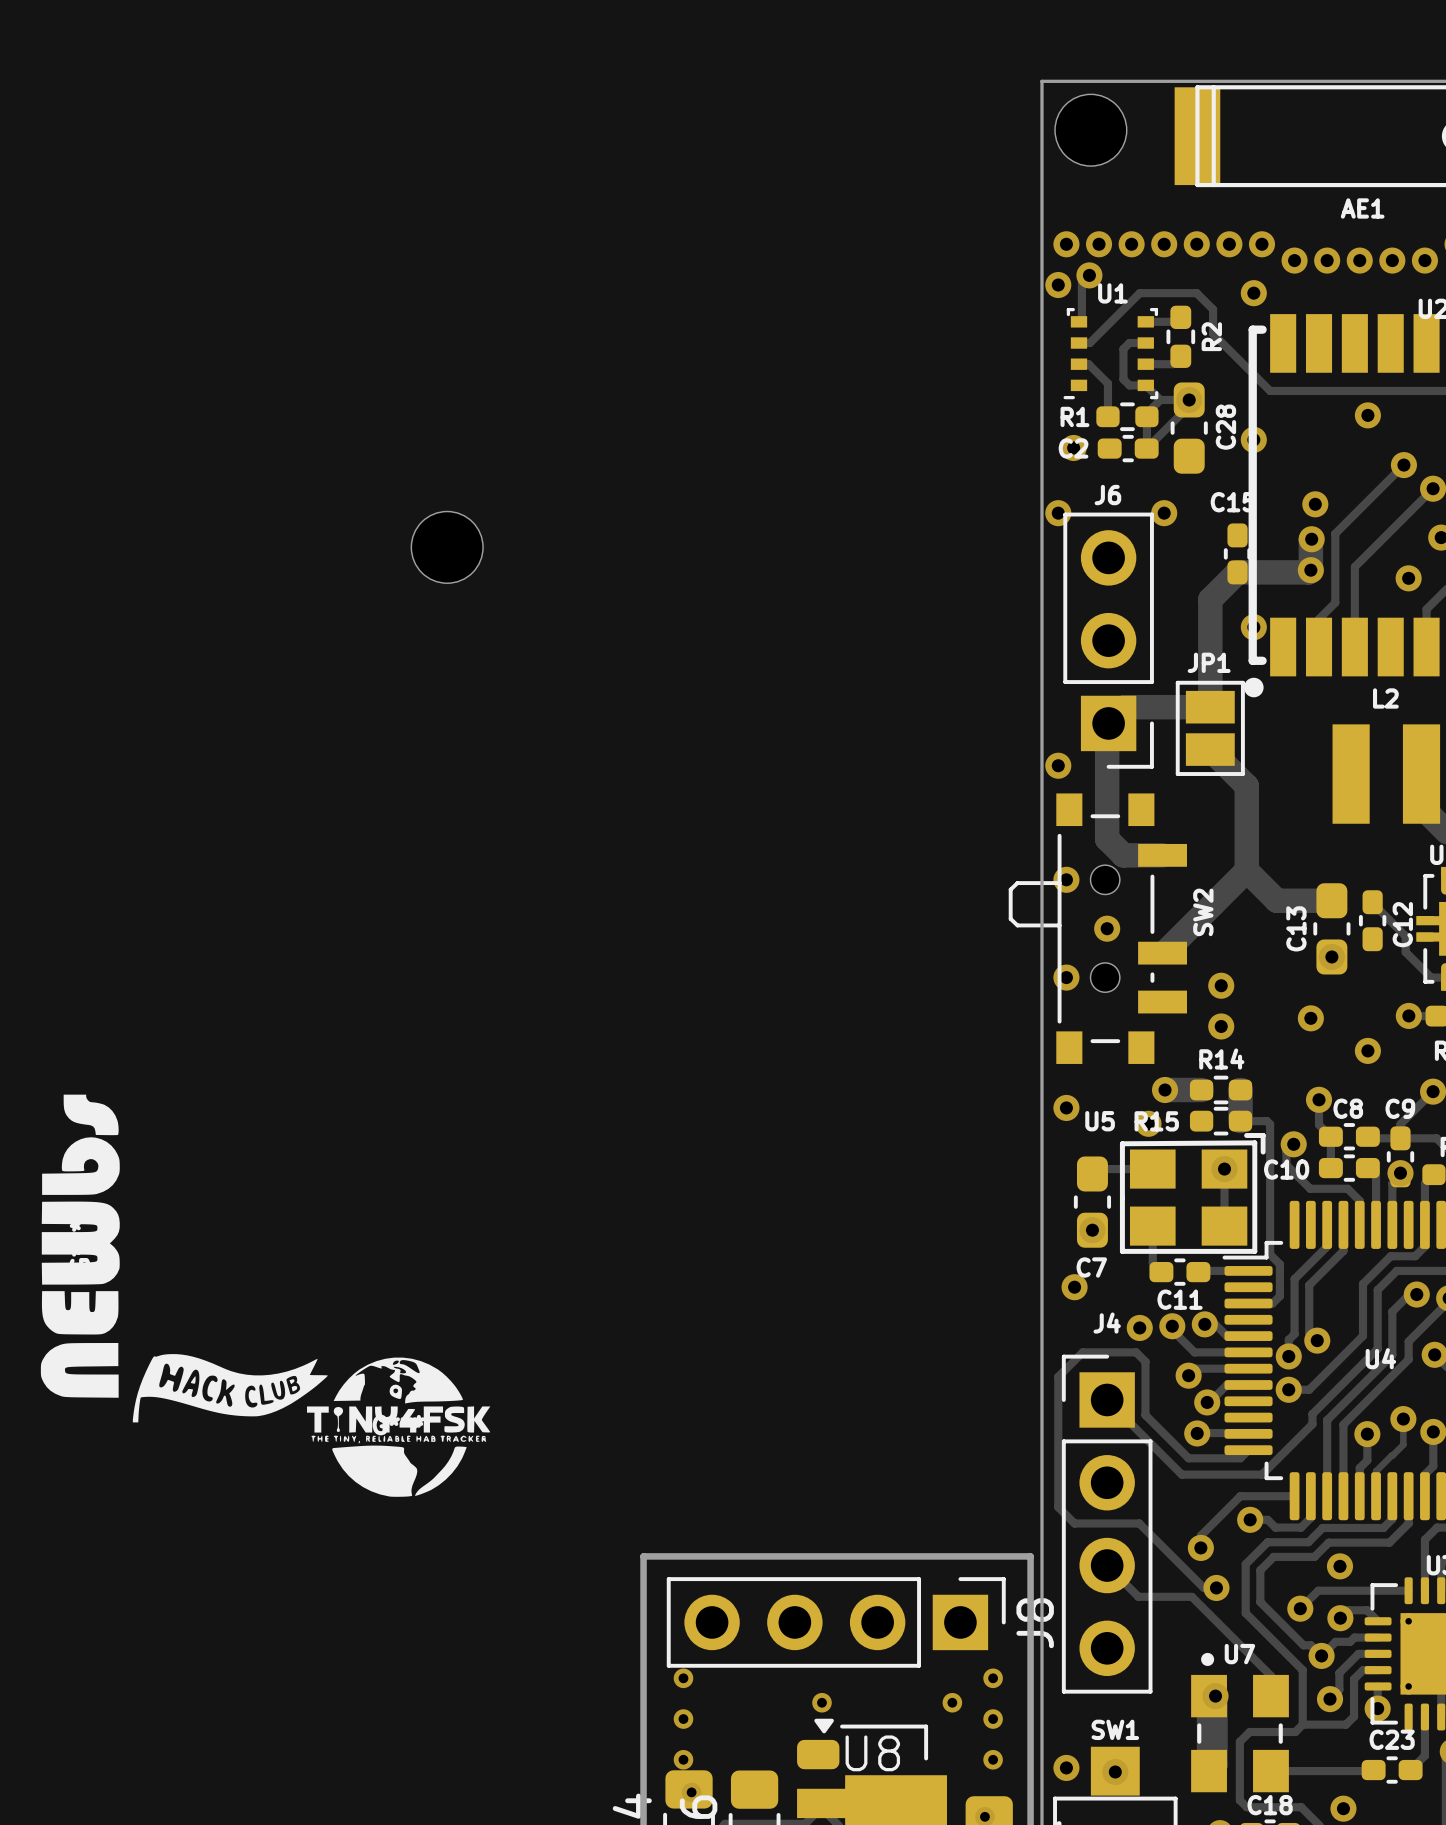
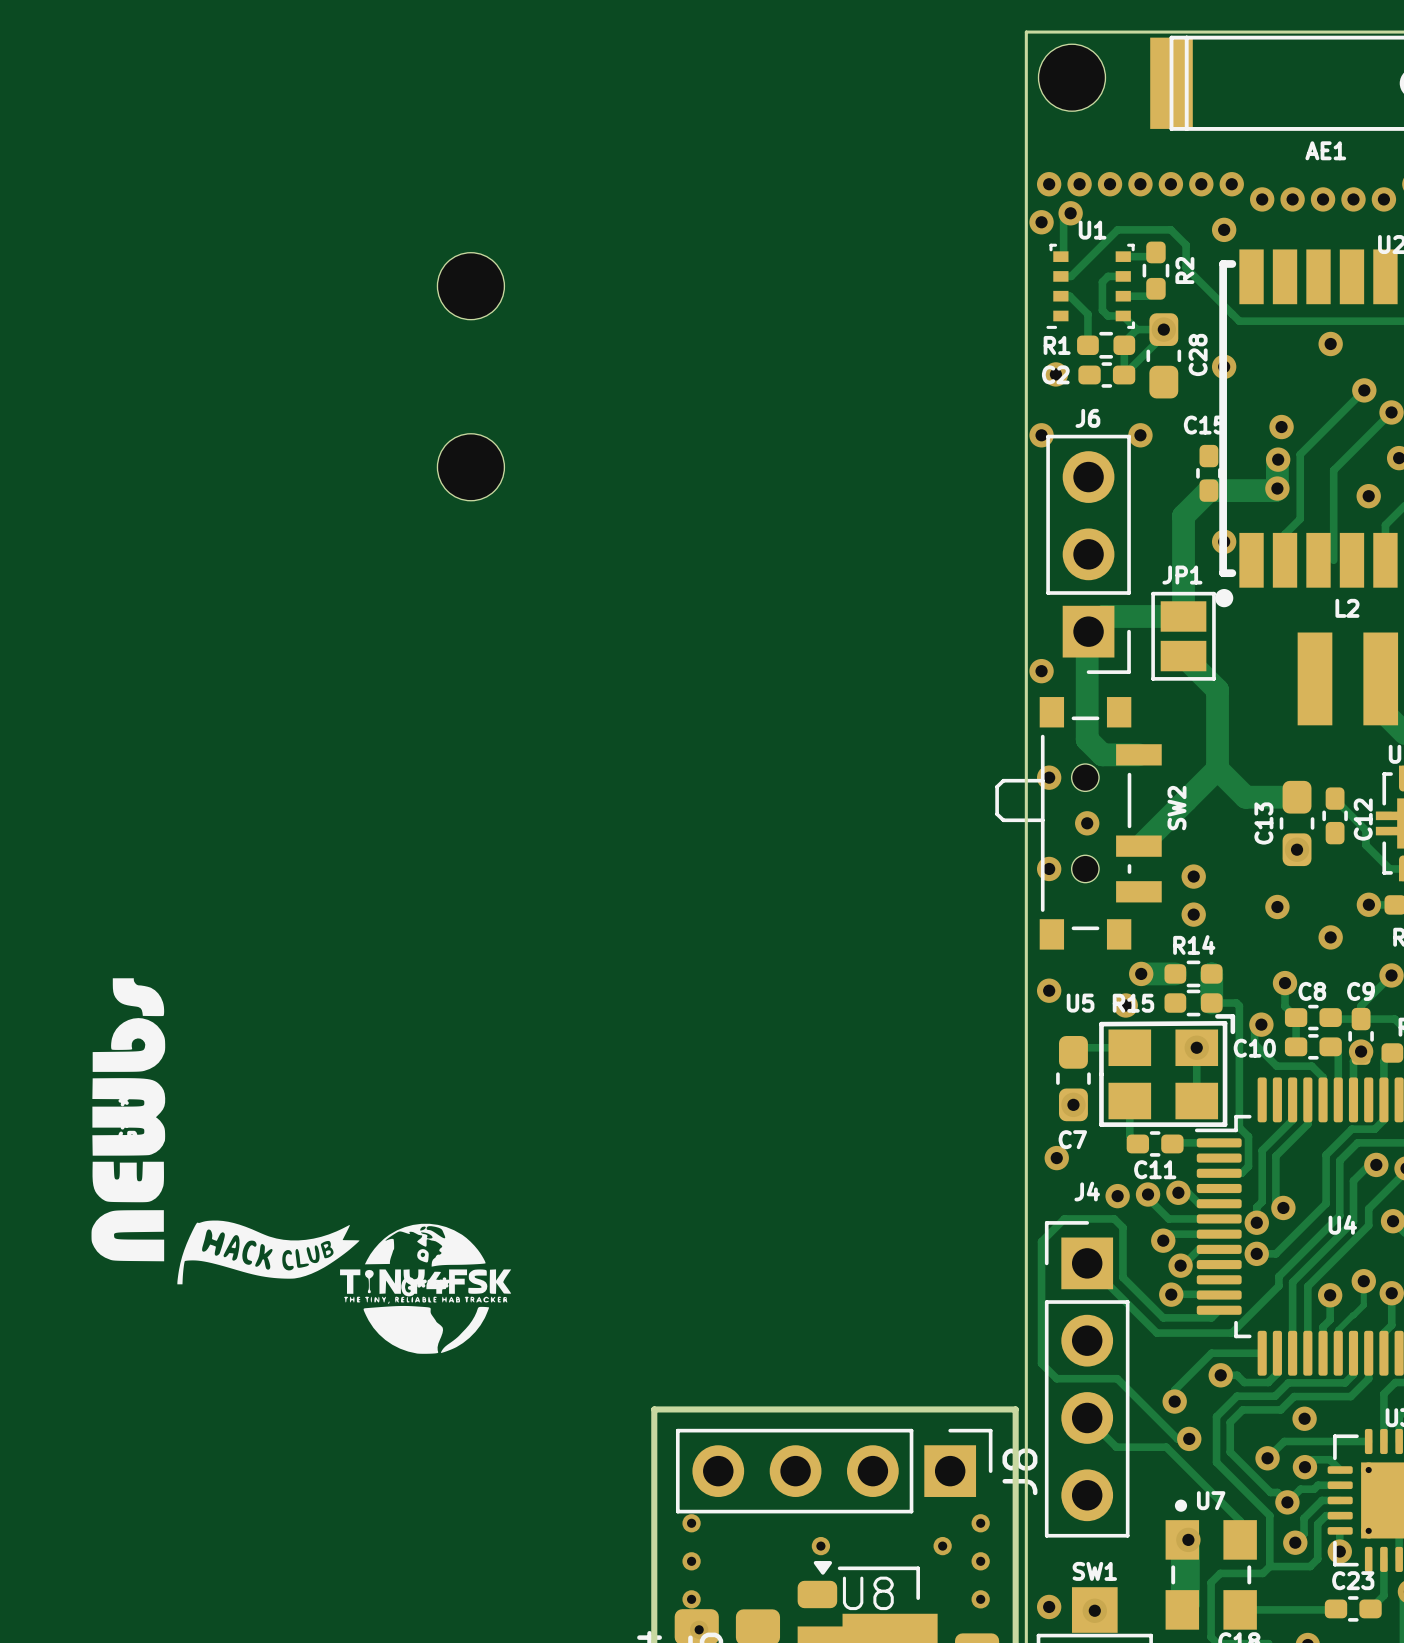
part: none -> (470, 286)
track: (1371, 550) (1354, 566) (1354, 647) -> (1333, 470) (1333, 560)

